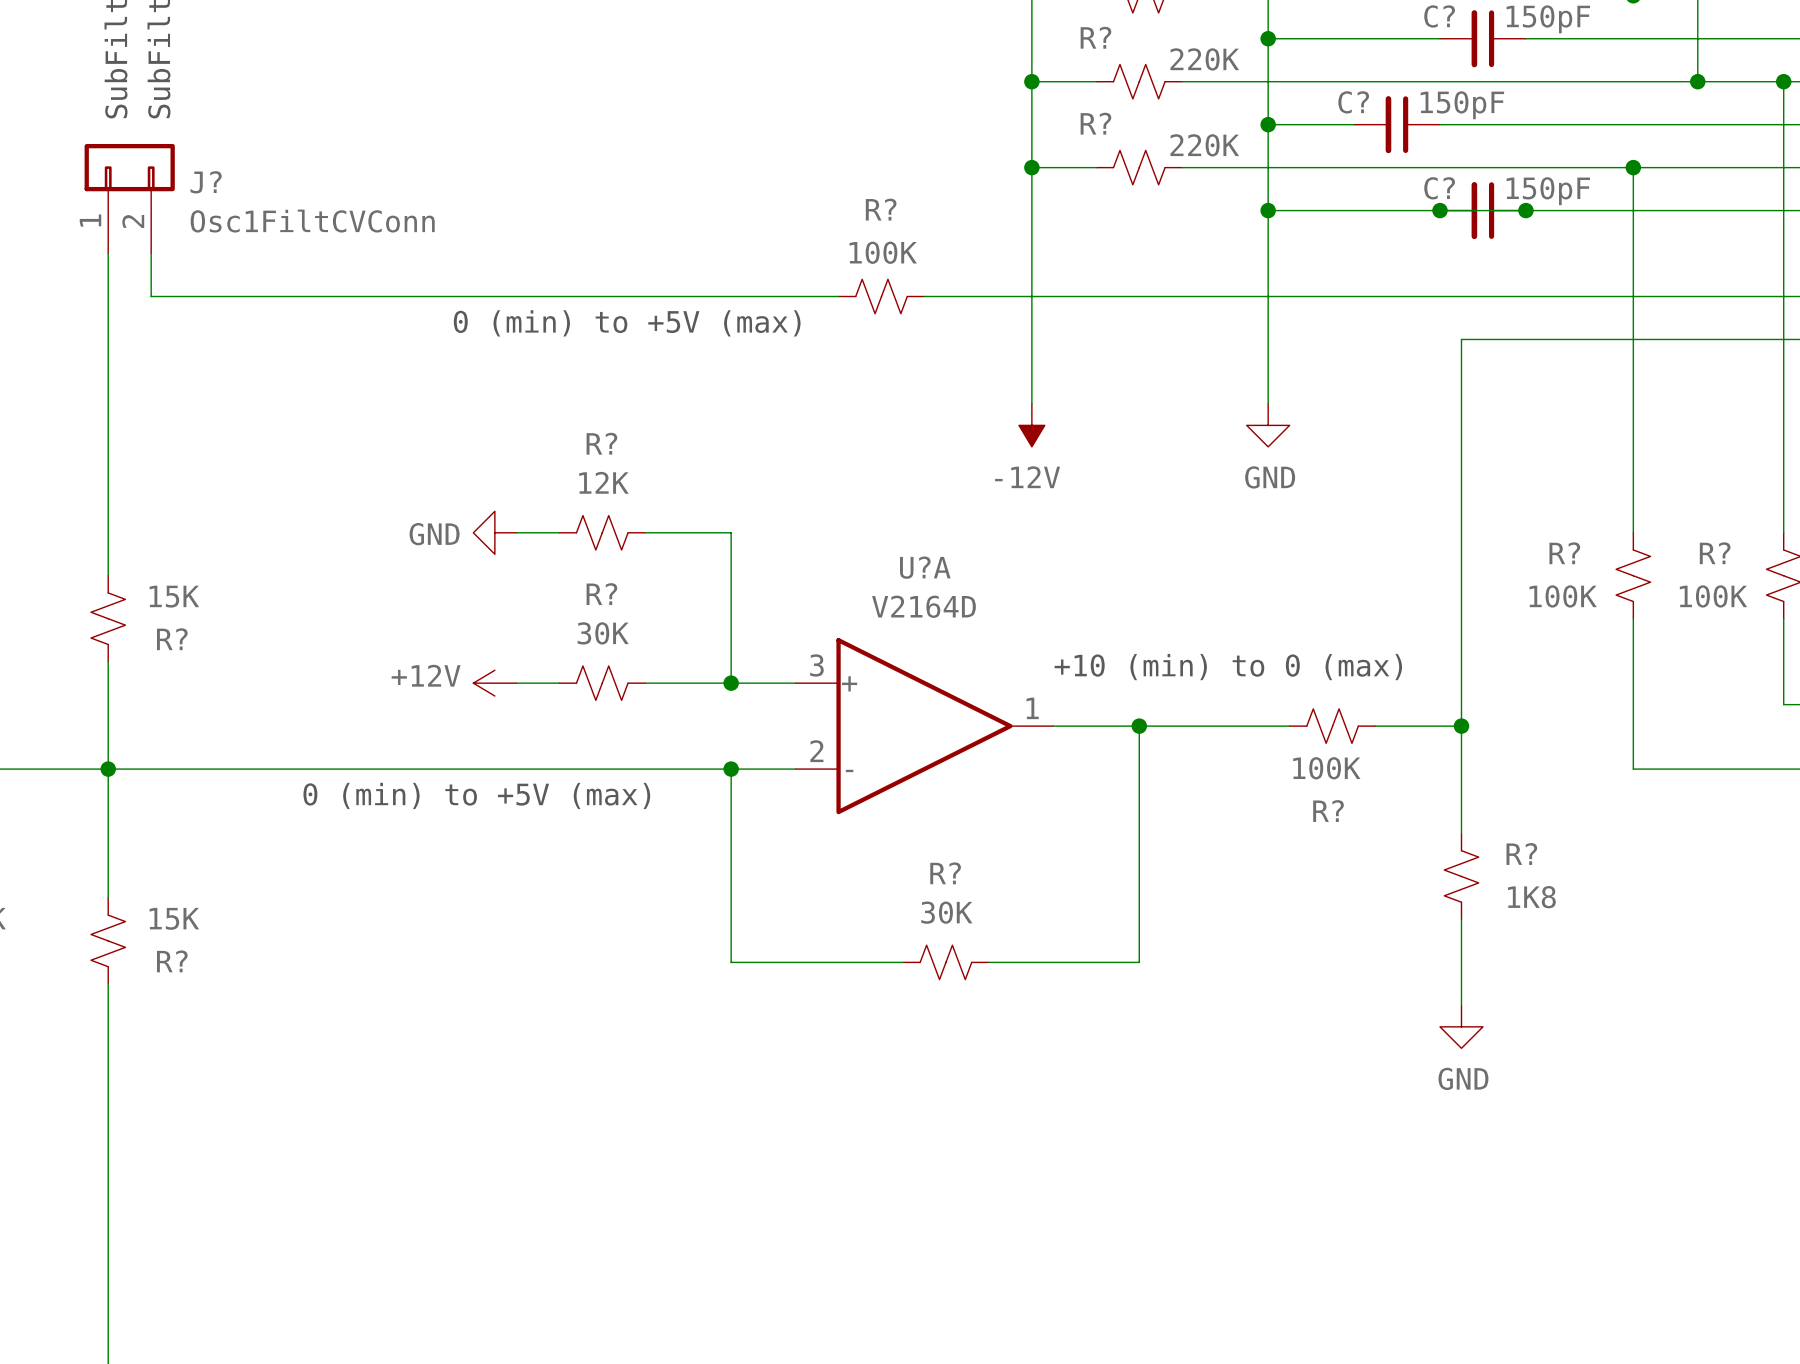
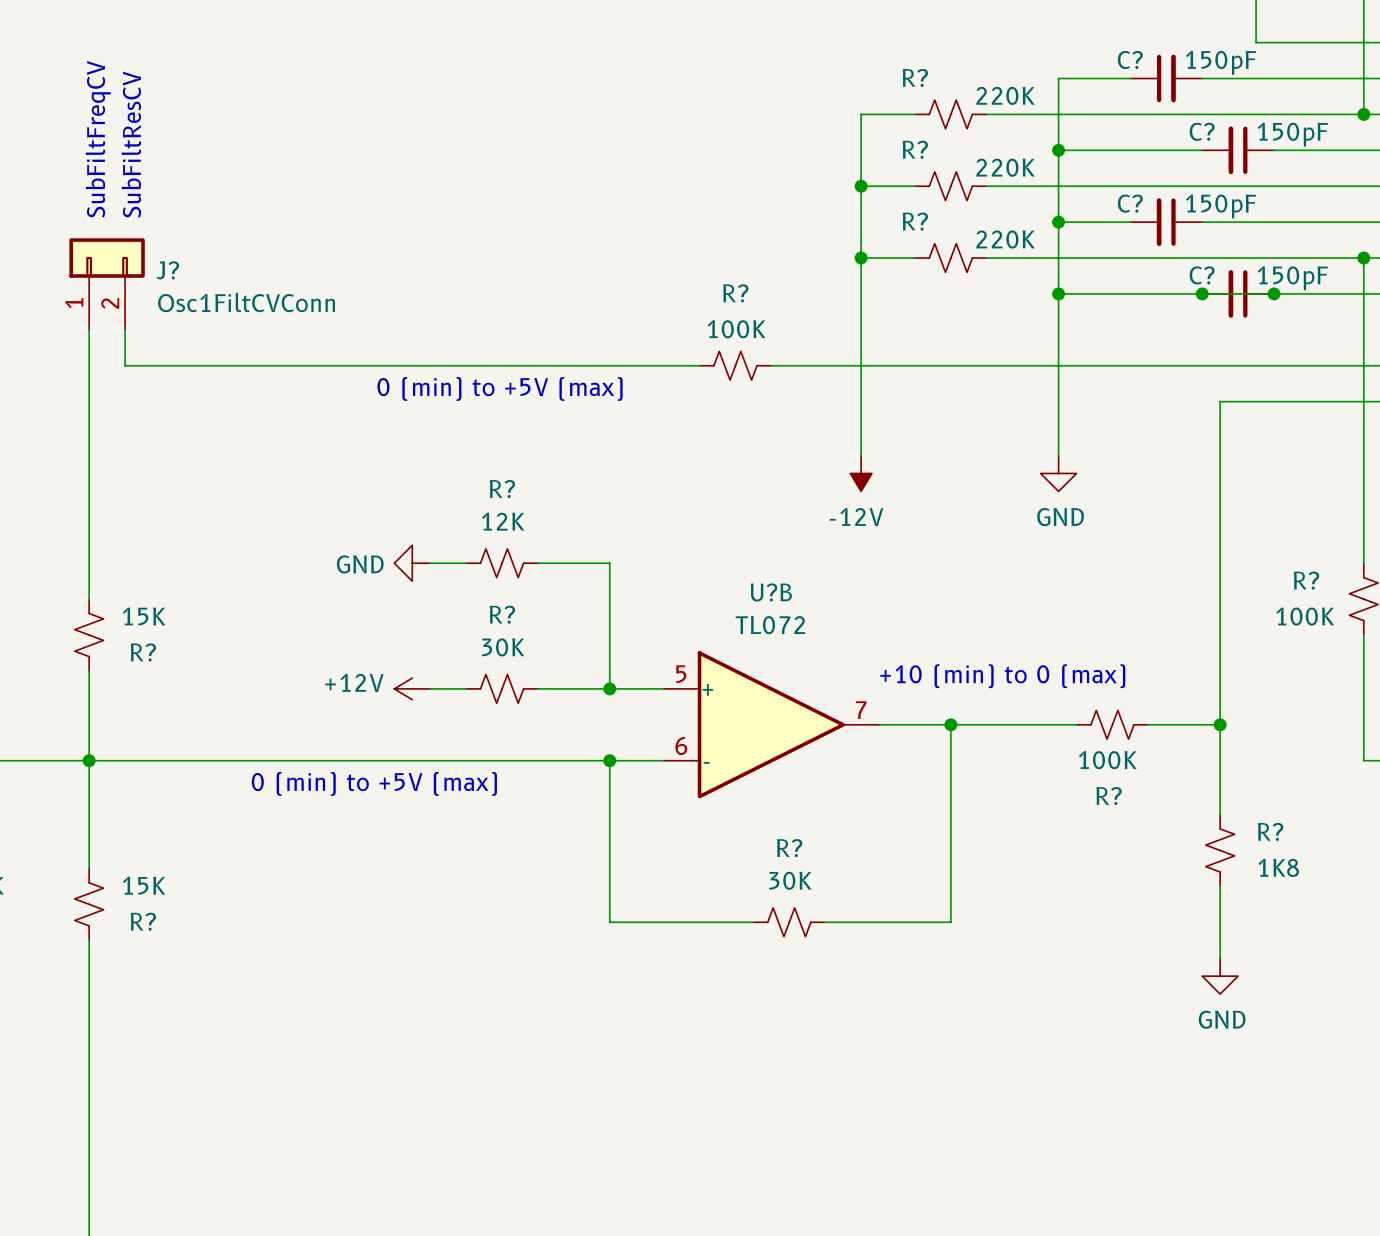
U?A name: U?A (925, 567) -> U?B (771, 592)
U?A value: V2164D (923, 606) -> TL072 (770, 625)
U?A pin number: 3 (816, 665) -> 5 (681, 674)
U?A pin number: 1 (1032, 708) -> 7 (861, 710)
U?A pin number: 2 (816, 751) -> 6 (681, 746)

